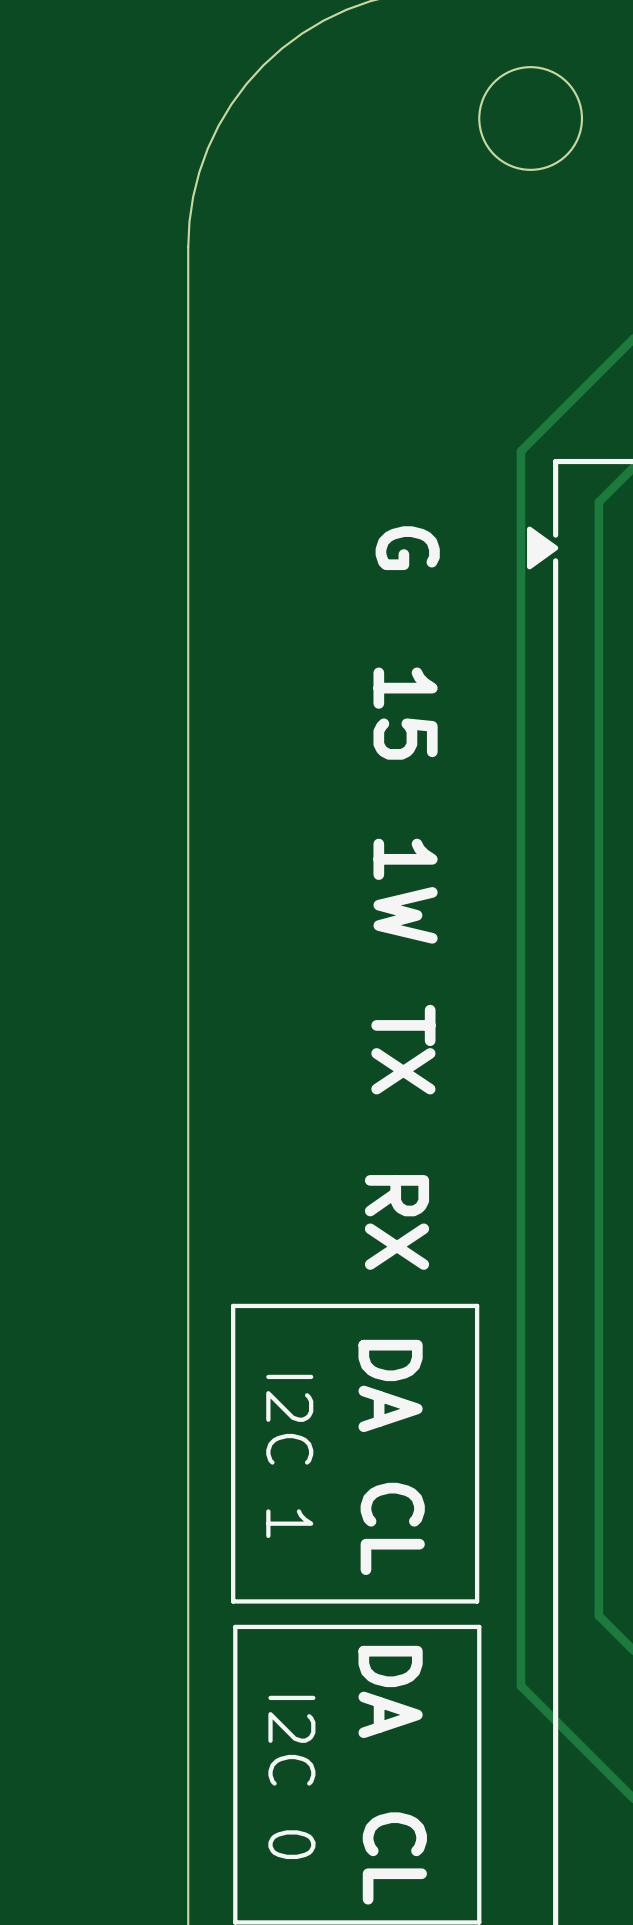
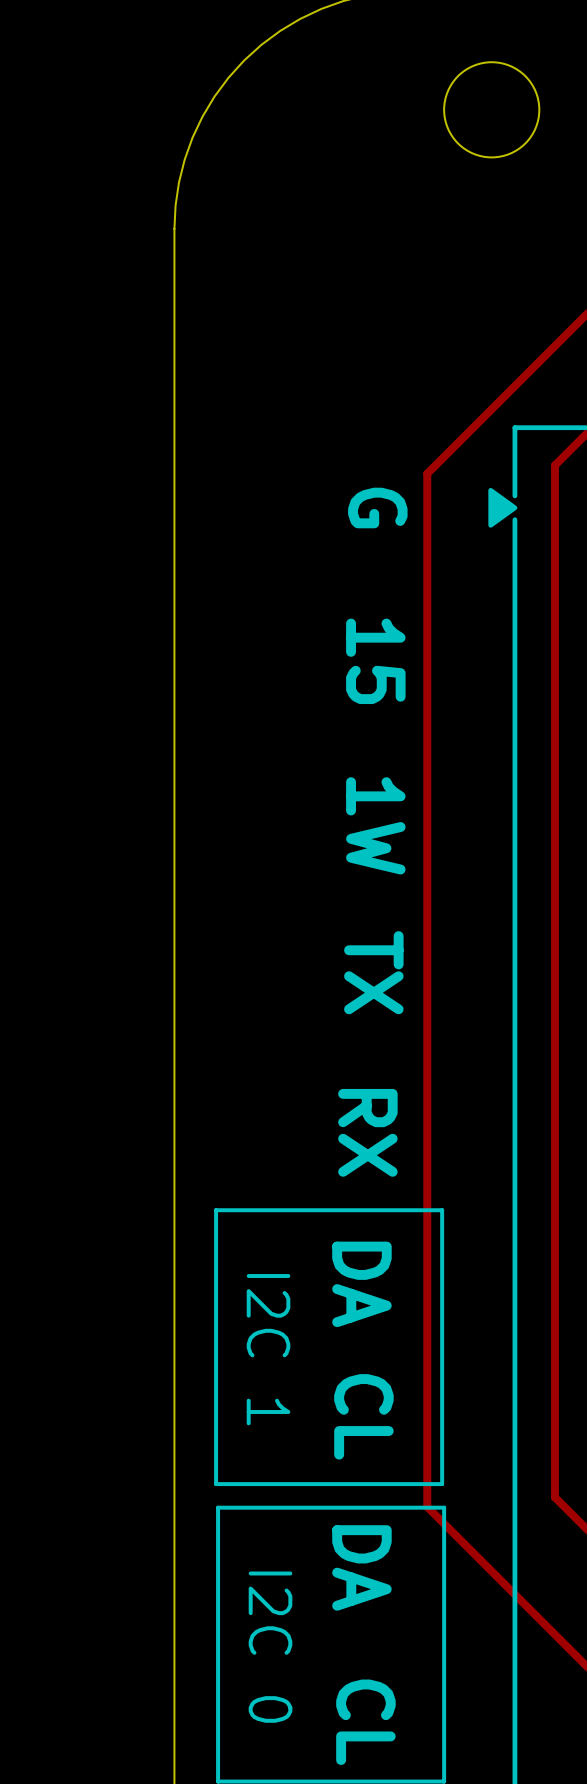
track: (520, 451) (520, 1685) -> (482, 418) (427, 473) (427, 1506) (482, 1562)

